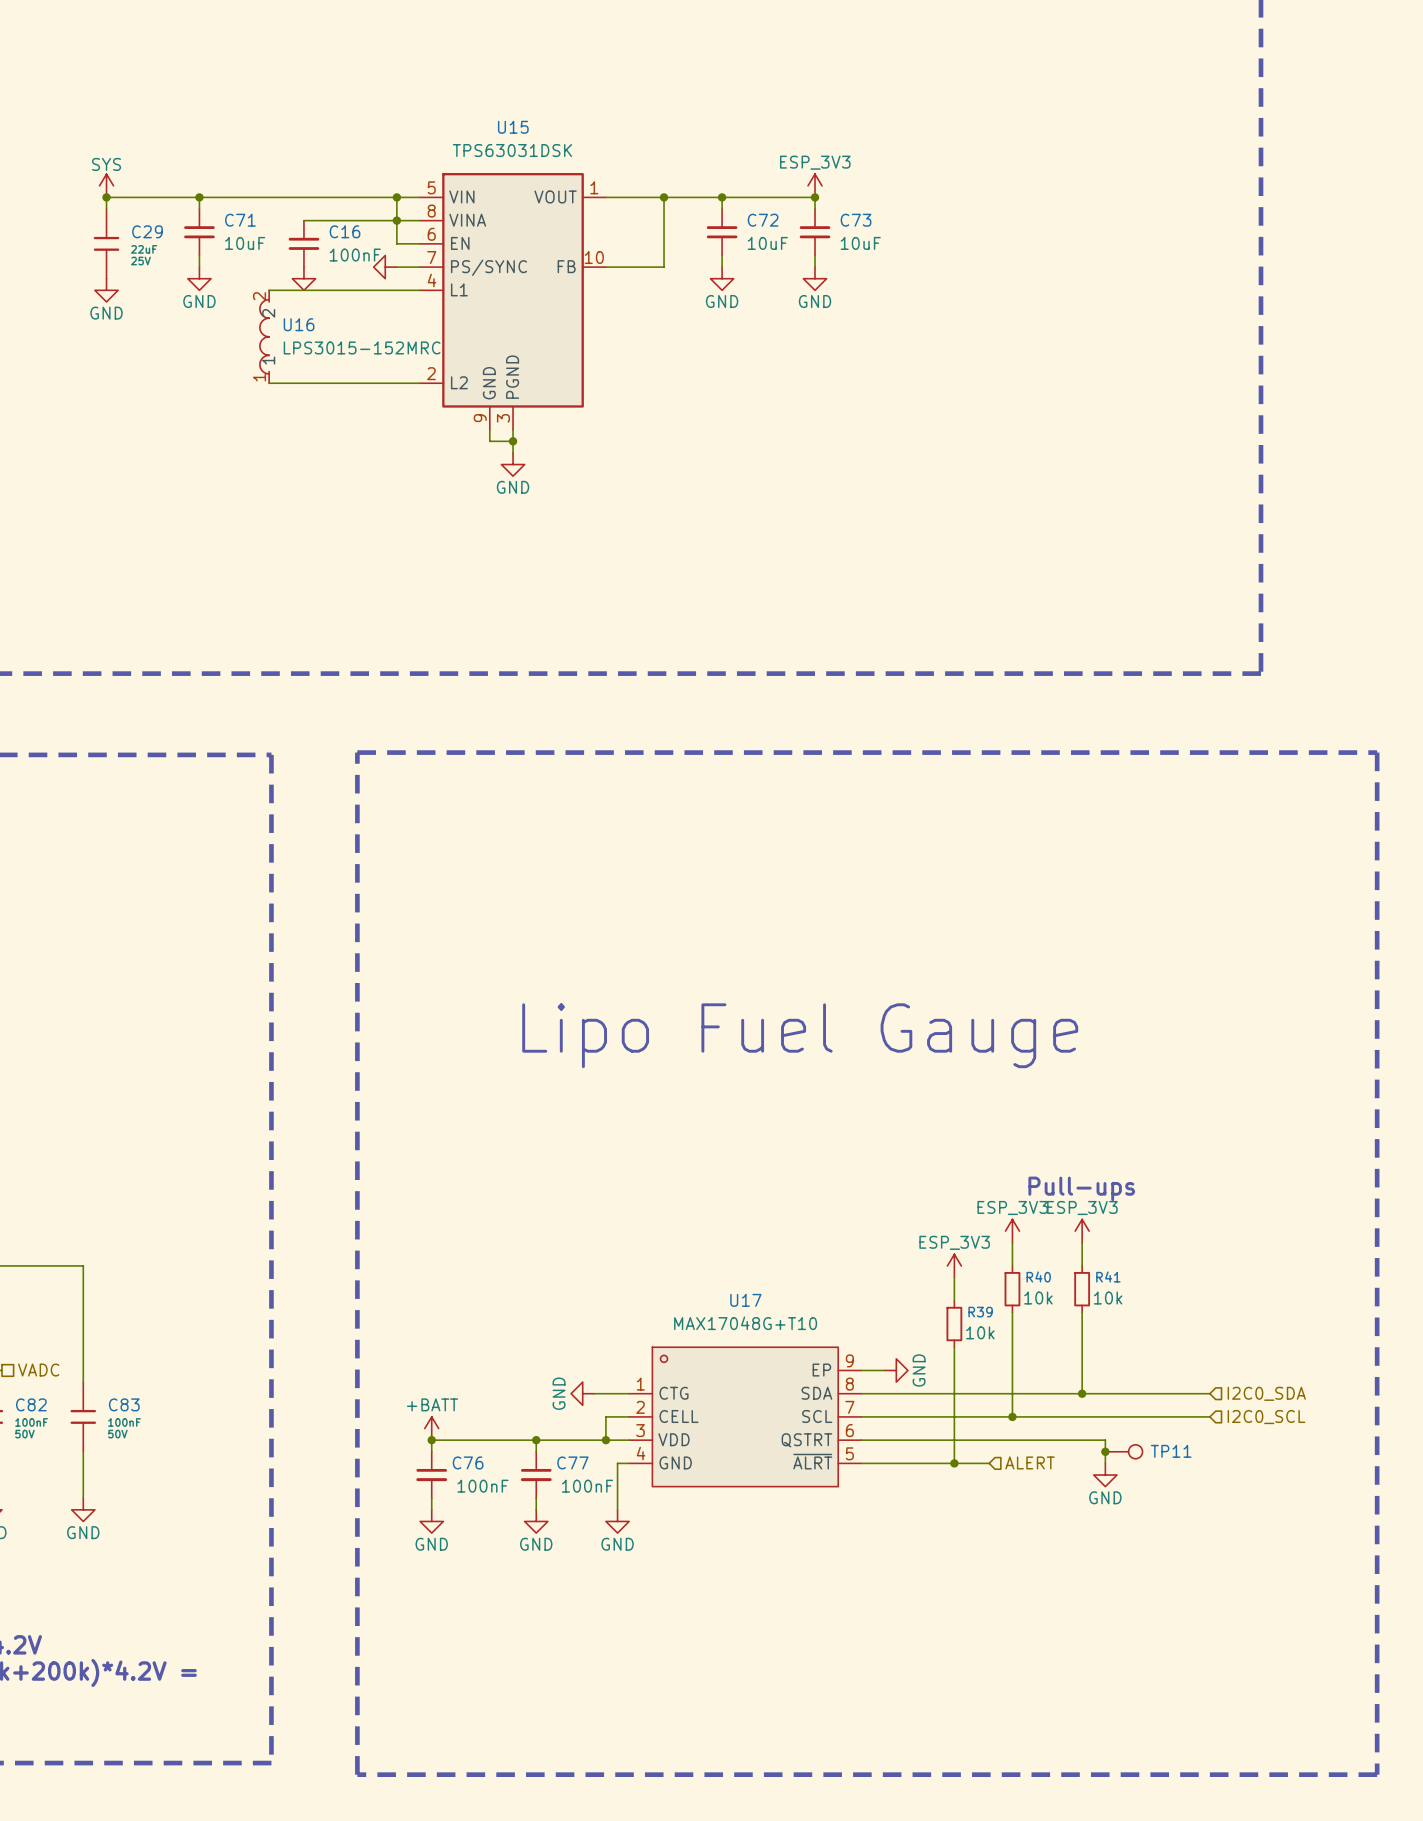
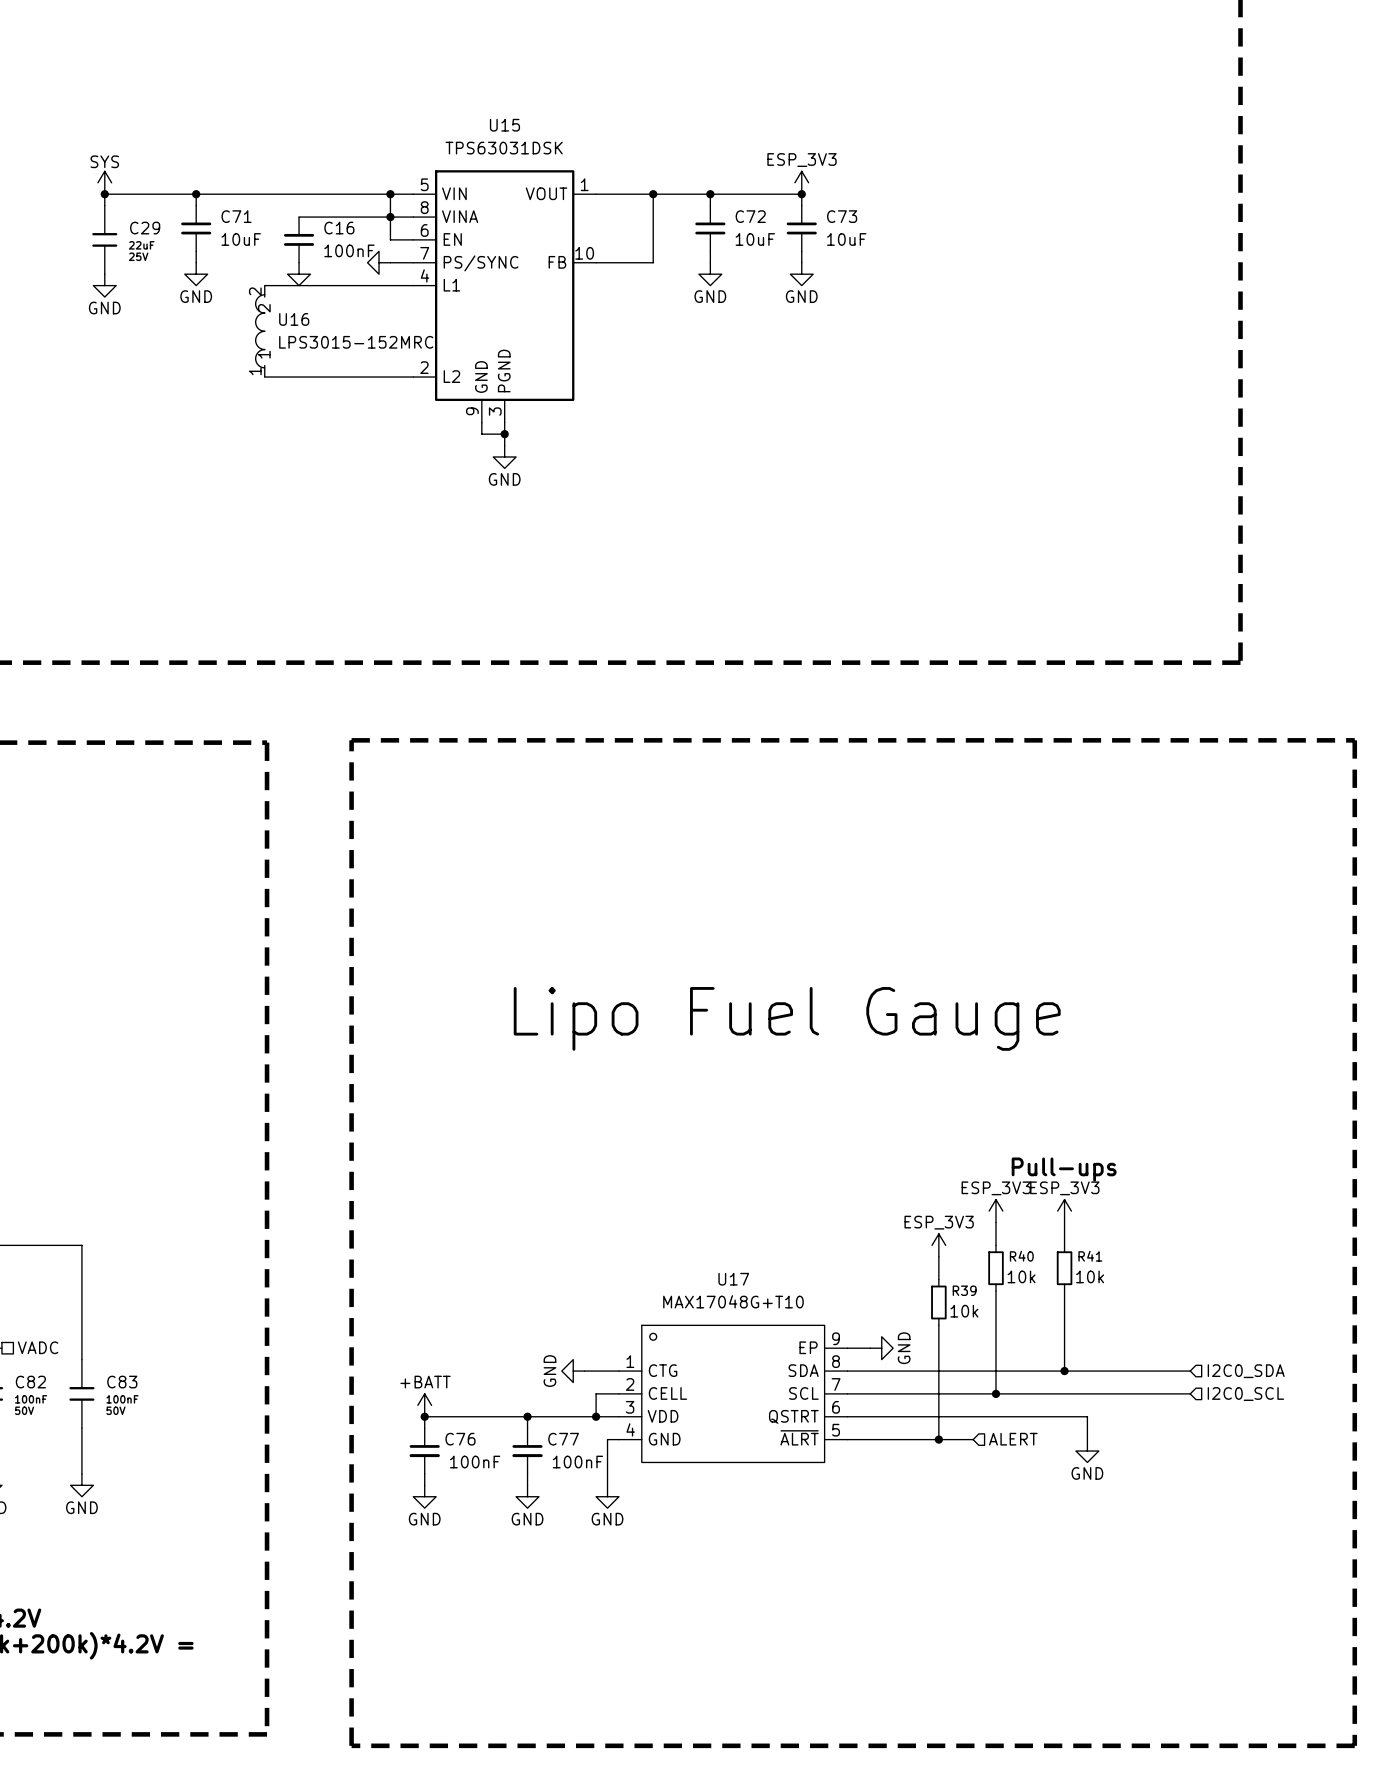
junction: (1105, 1451) -> none
TP11: (1123, 1451) -> none

